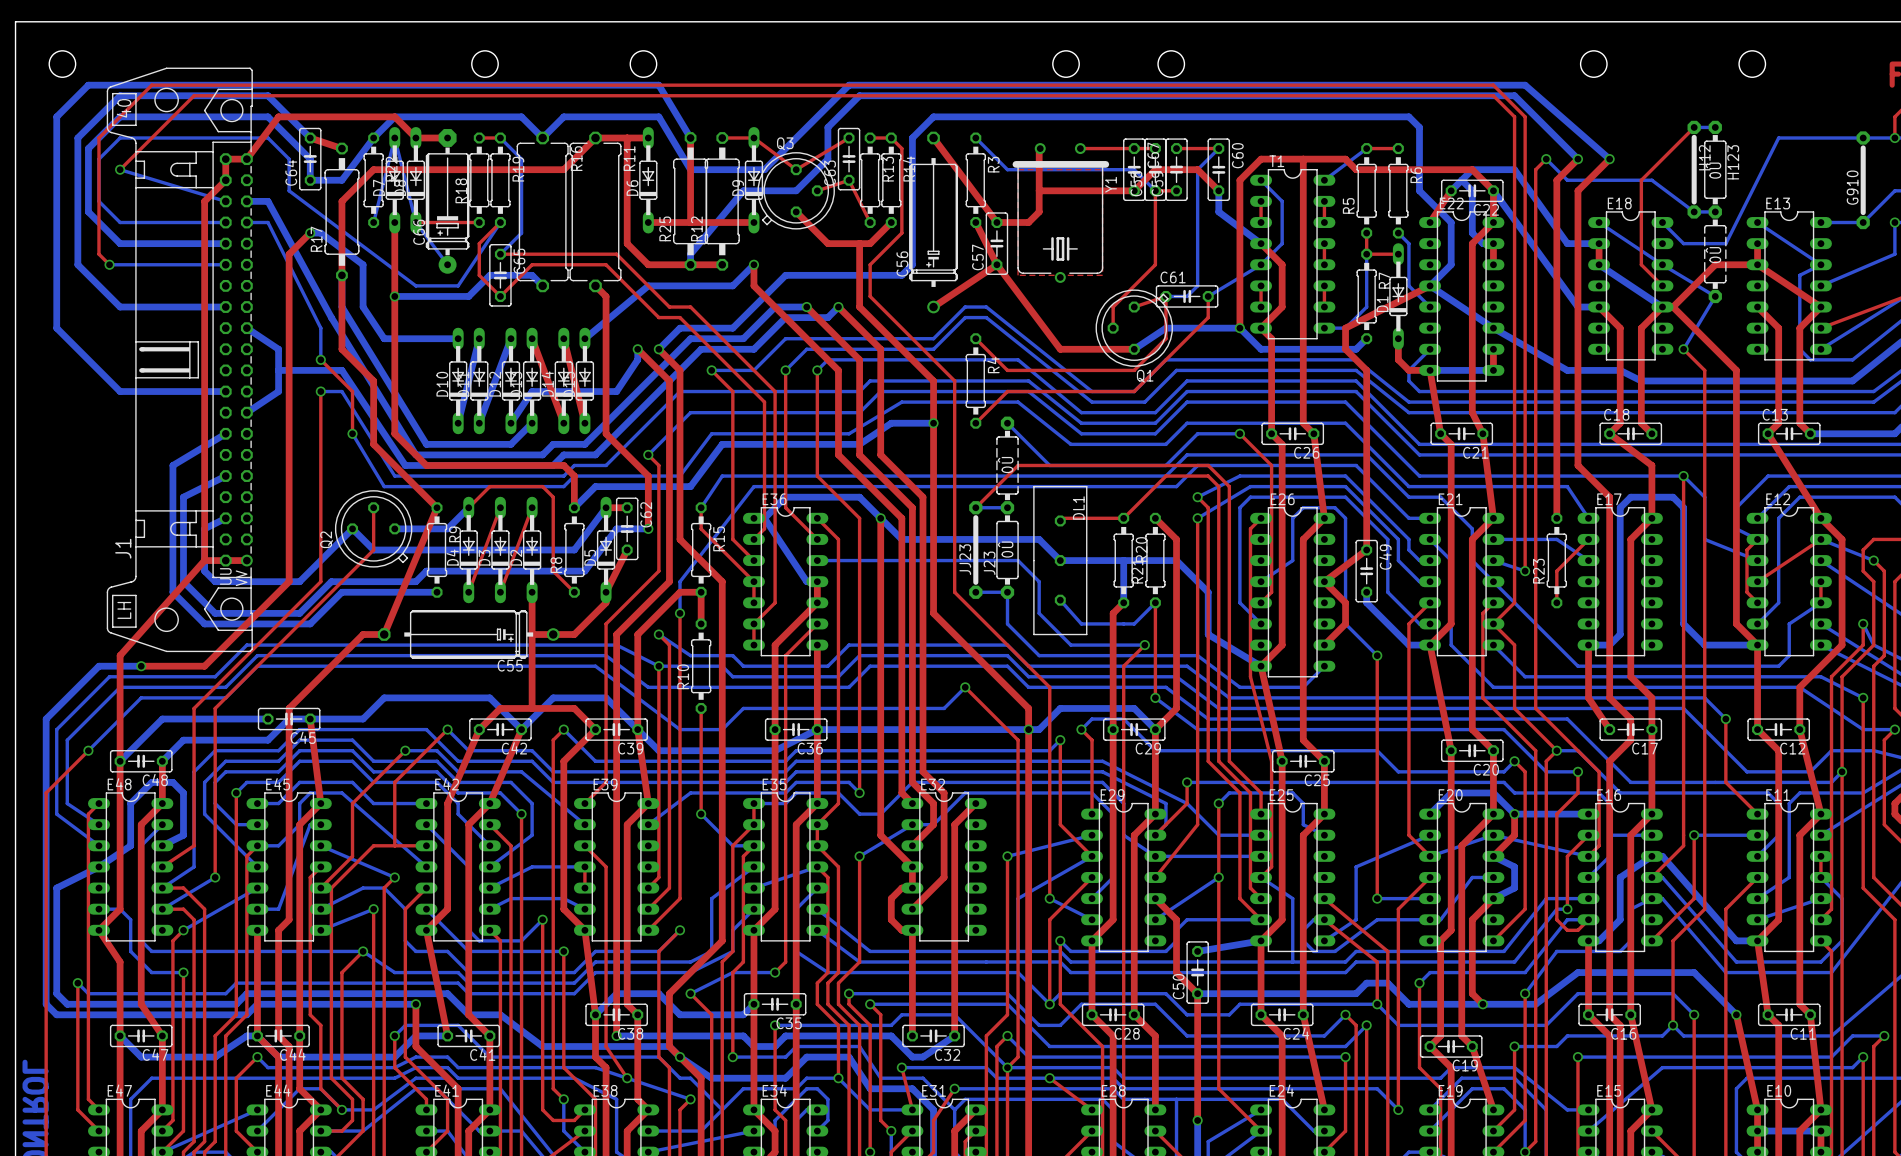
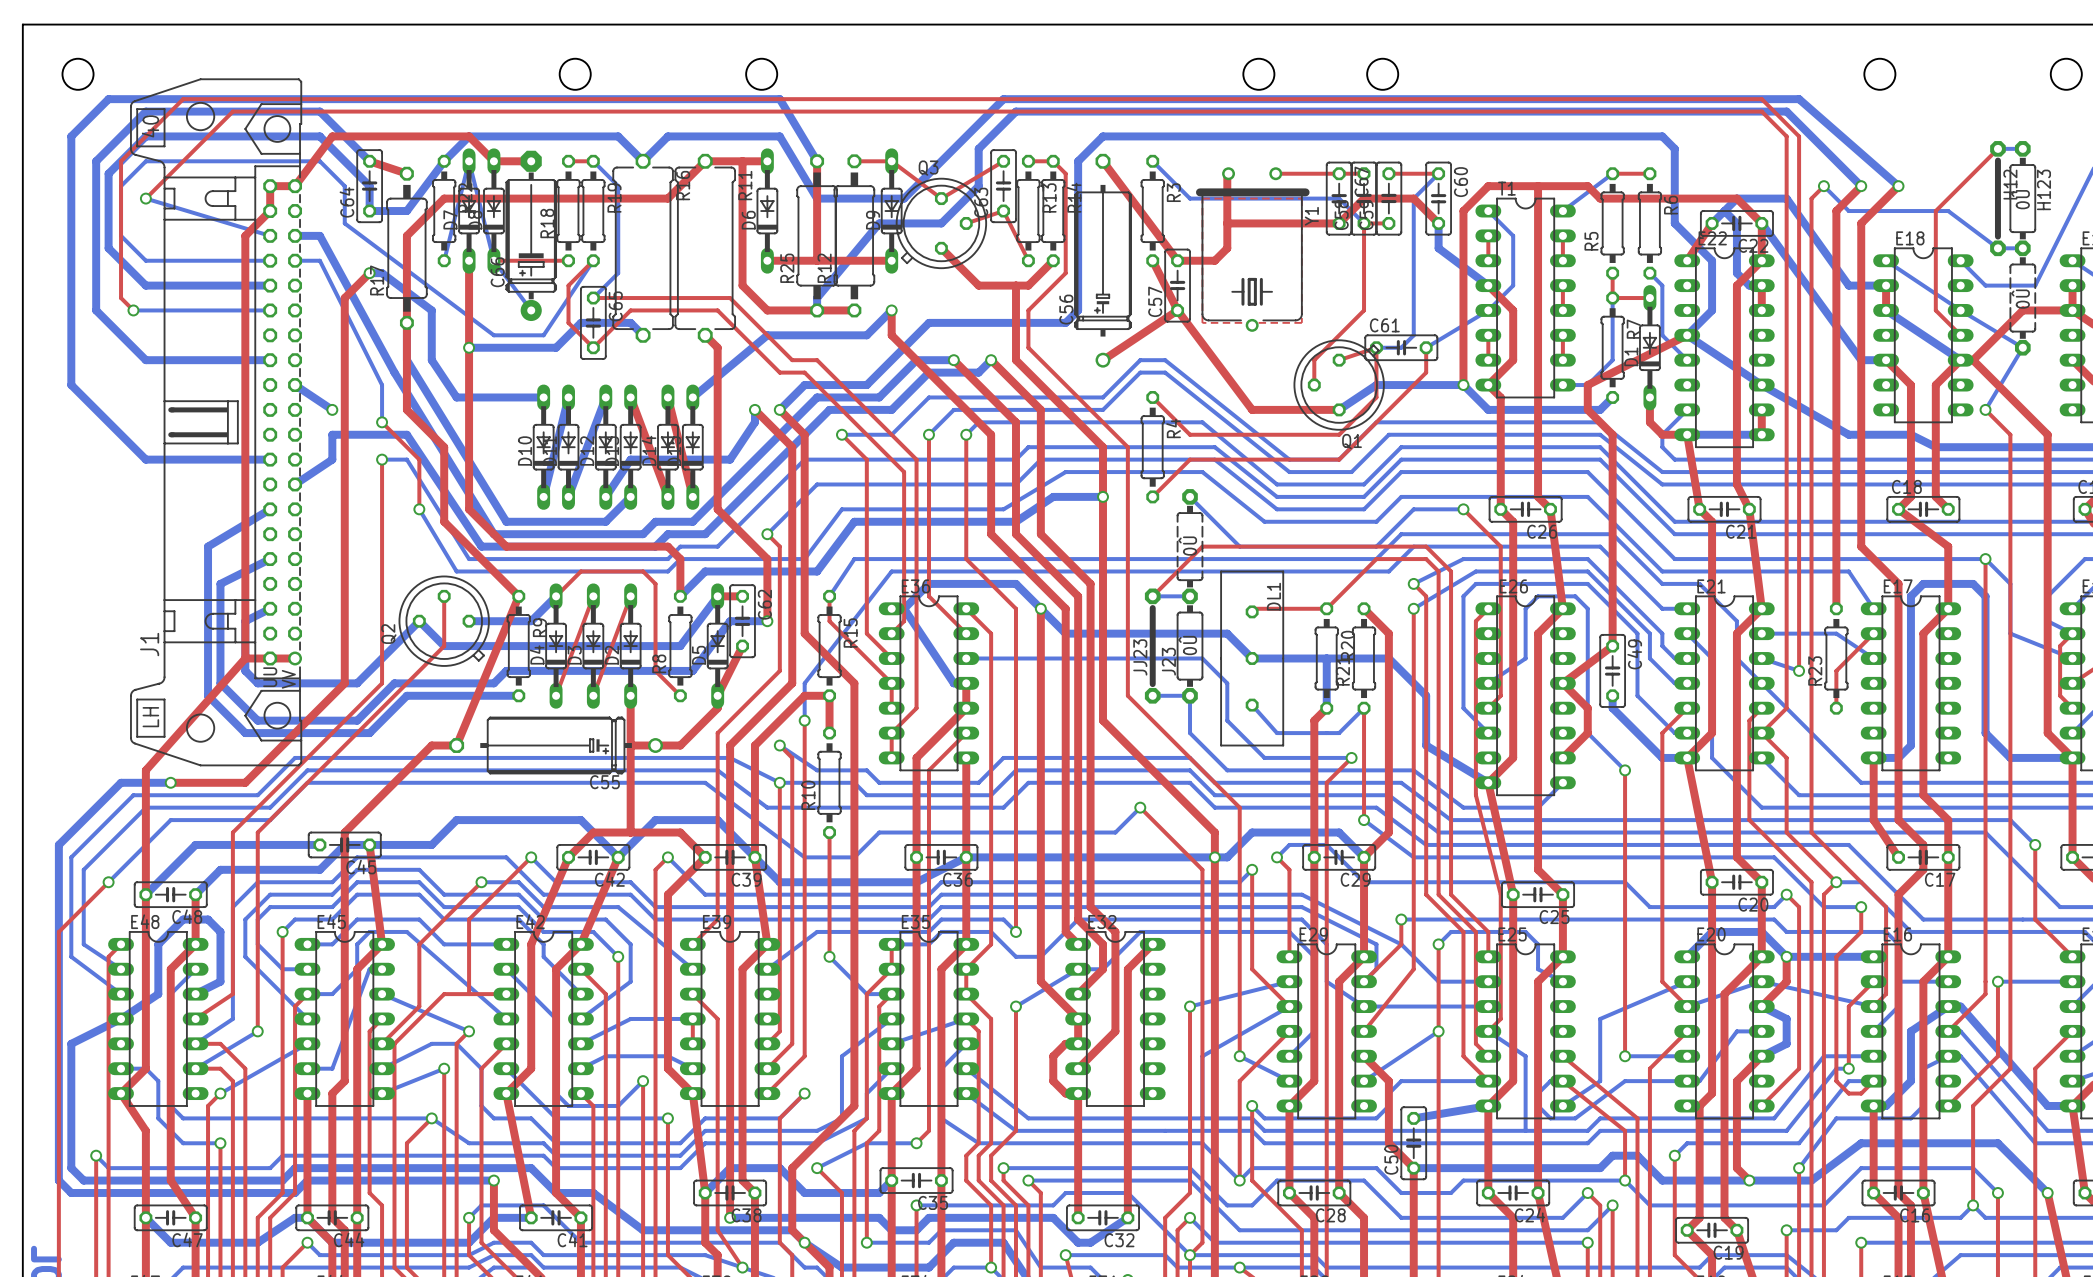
bottom track: (278, 349) (278, 370) -> none
via: none -> (332, 409)

